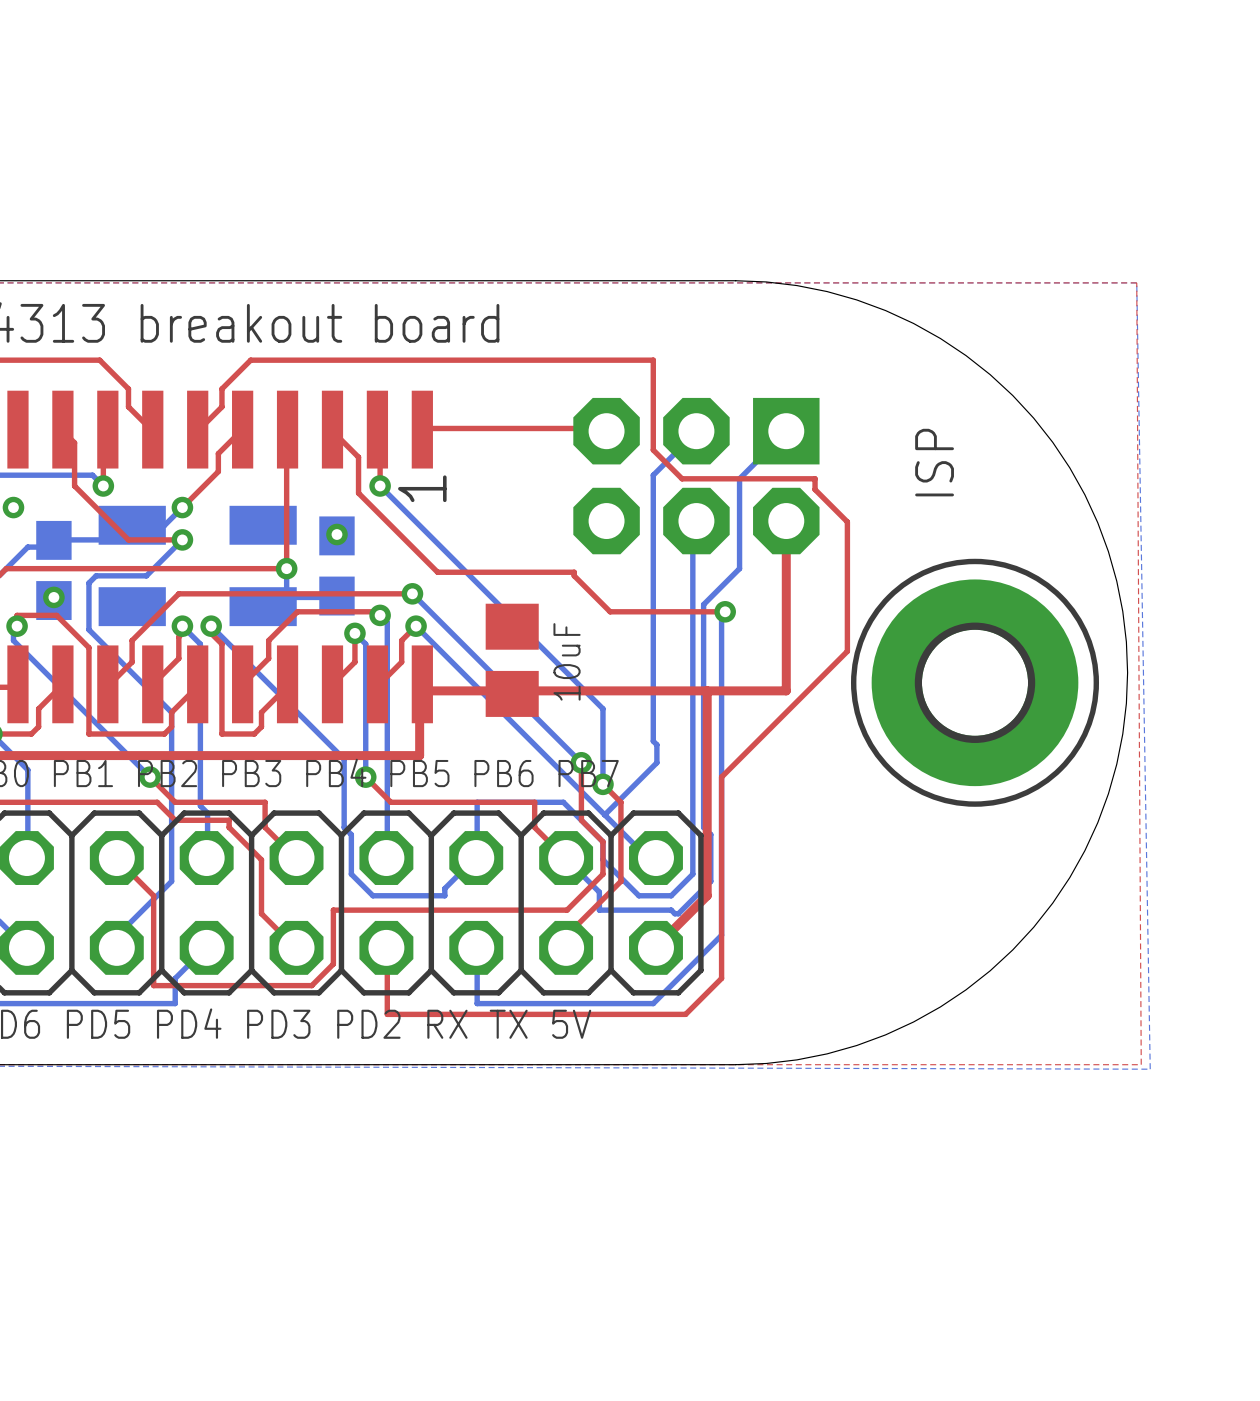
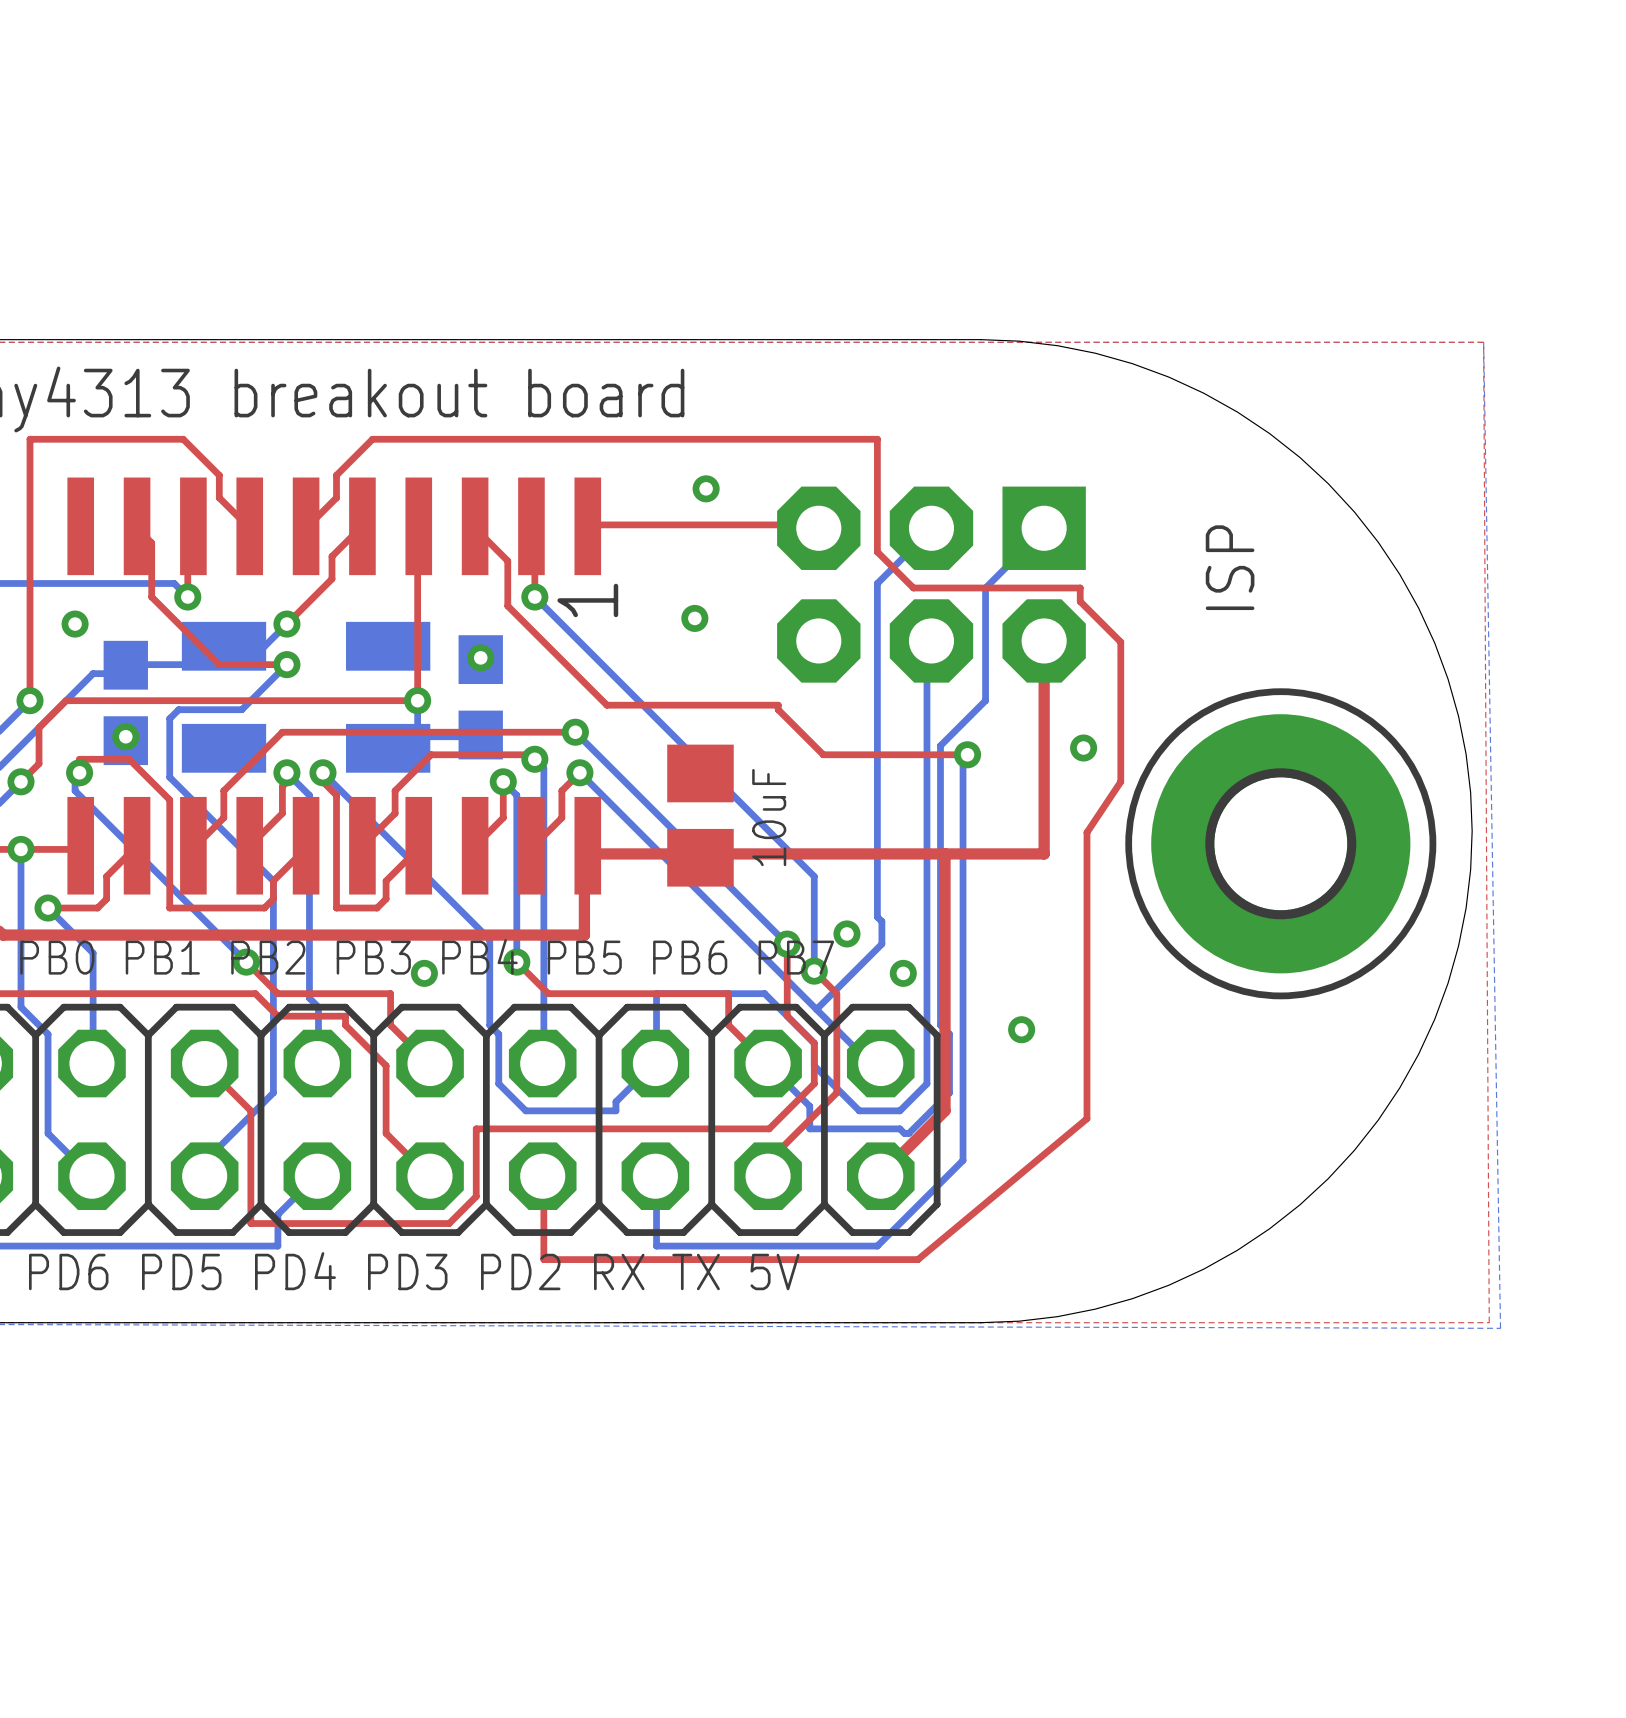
via: none -> (706, 488)
via: none -> (694, 618)
via: none -> (1083, 748)
top track: (847, 633) (847, 651) (721, 777) (721, 978) (685, 1014) -> (1120, 781) (1086, 832) (1086, 1118) (917, 1259)
via: none -> (846, 933)
via: none -> (424, 973)
via: none -> (903, 973)
via: none -> (1021, 1029)

